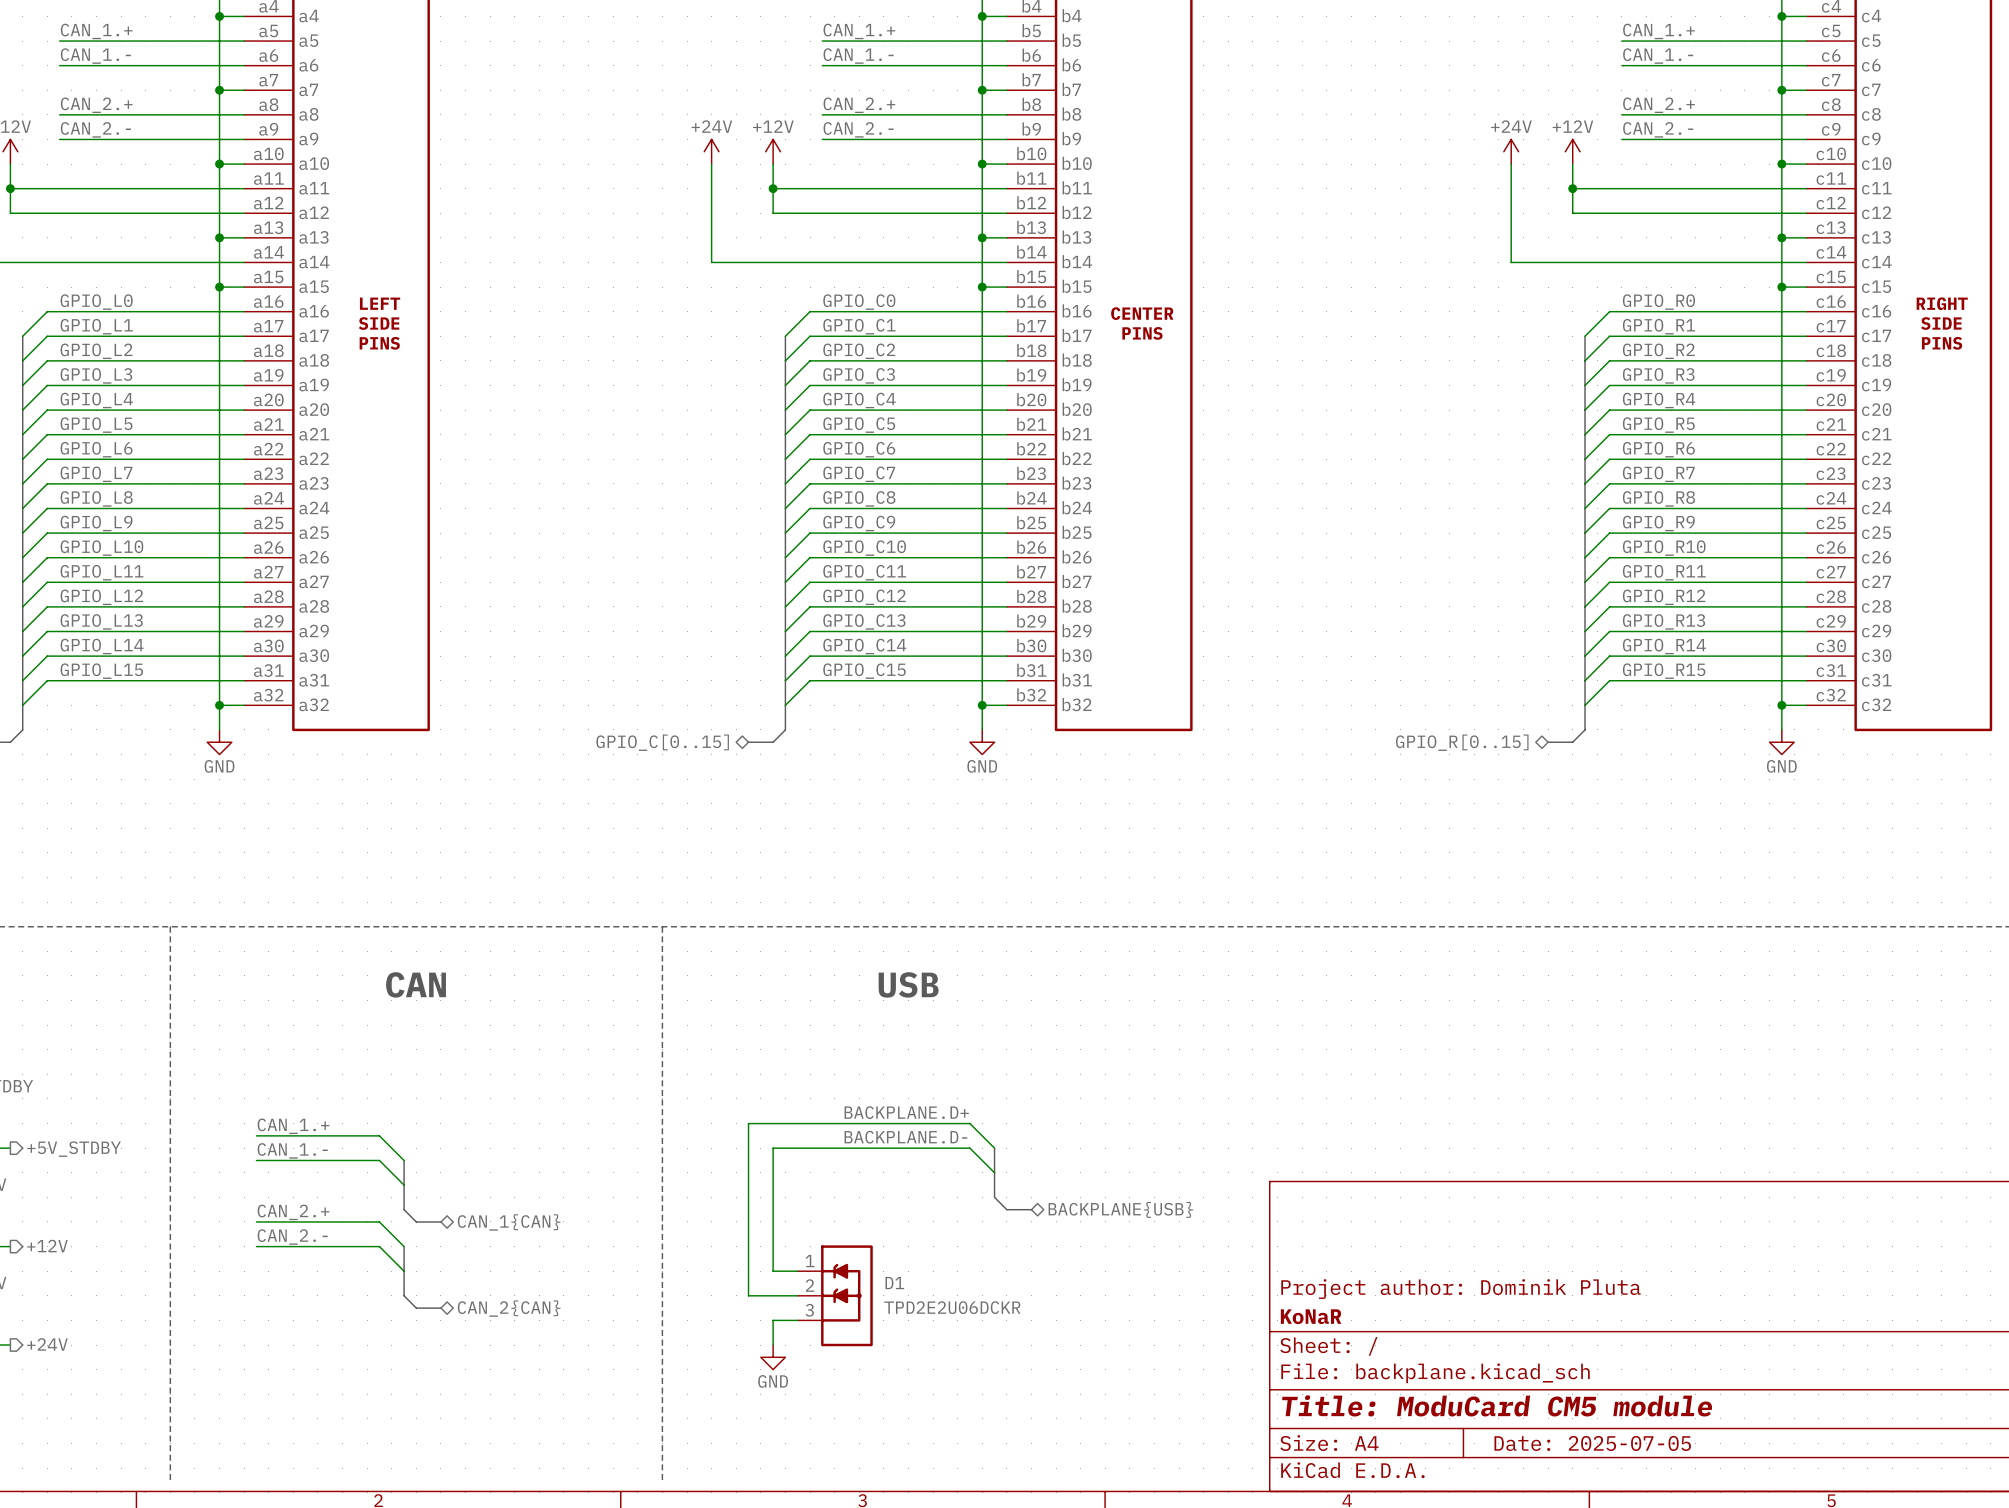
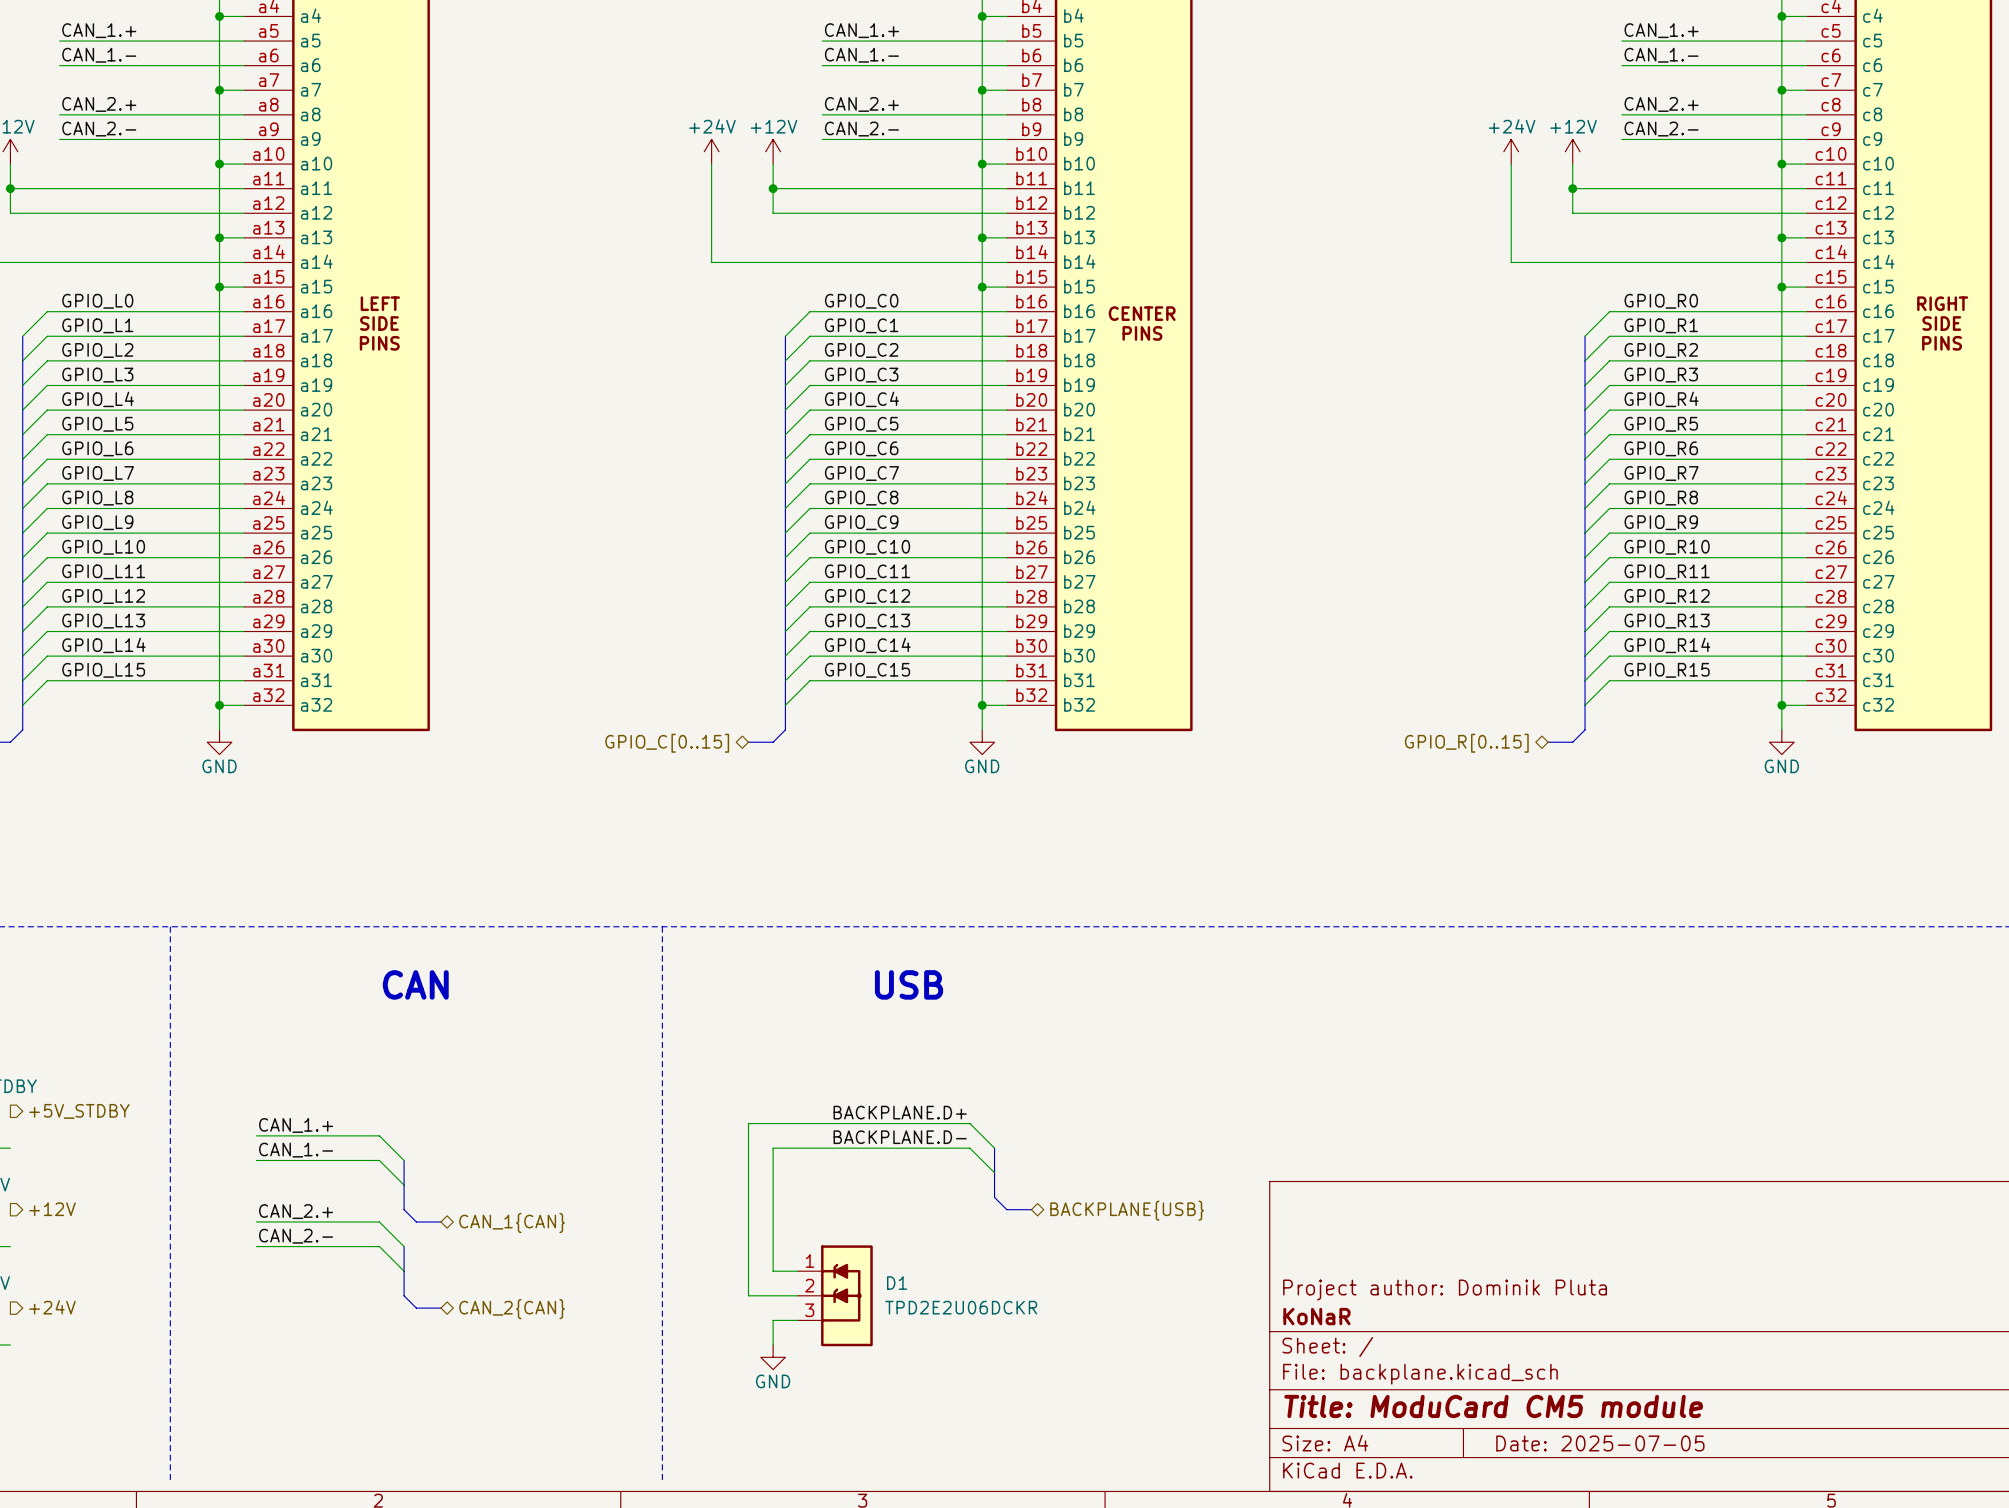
hierarchical label position: +5V_STDBY (74, 1149) -> +5V_STDBY (79, 1111)
hierarchical label position: +12V (47, 1246) -> +12V (52, 1209)
hierarchical label position: +24V (47, 1344) -> +24V (52, 1307)

